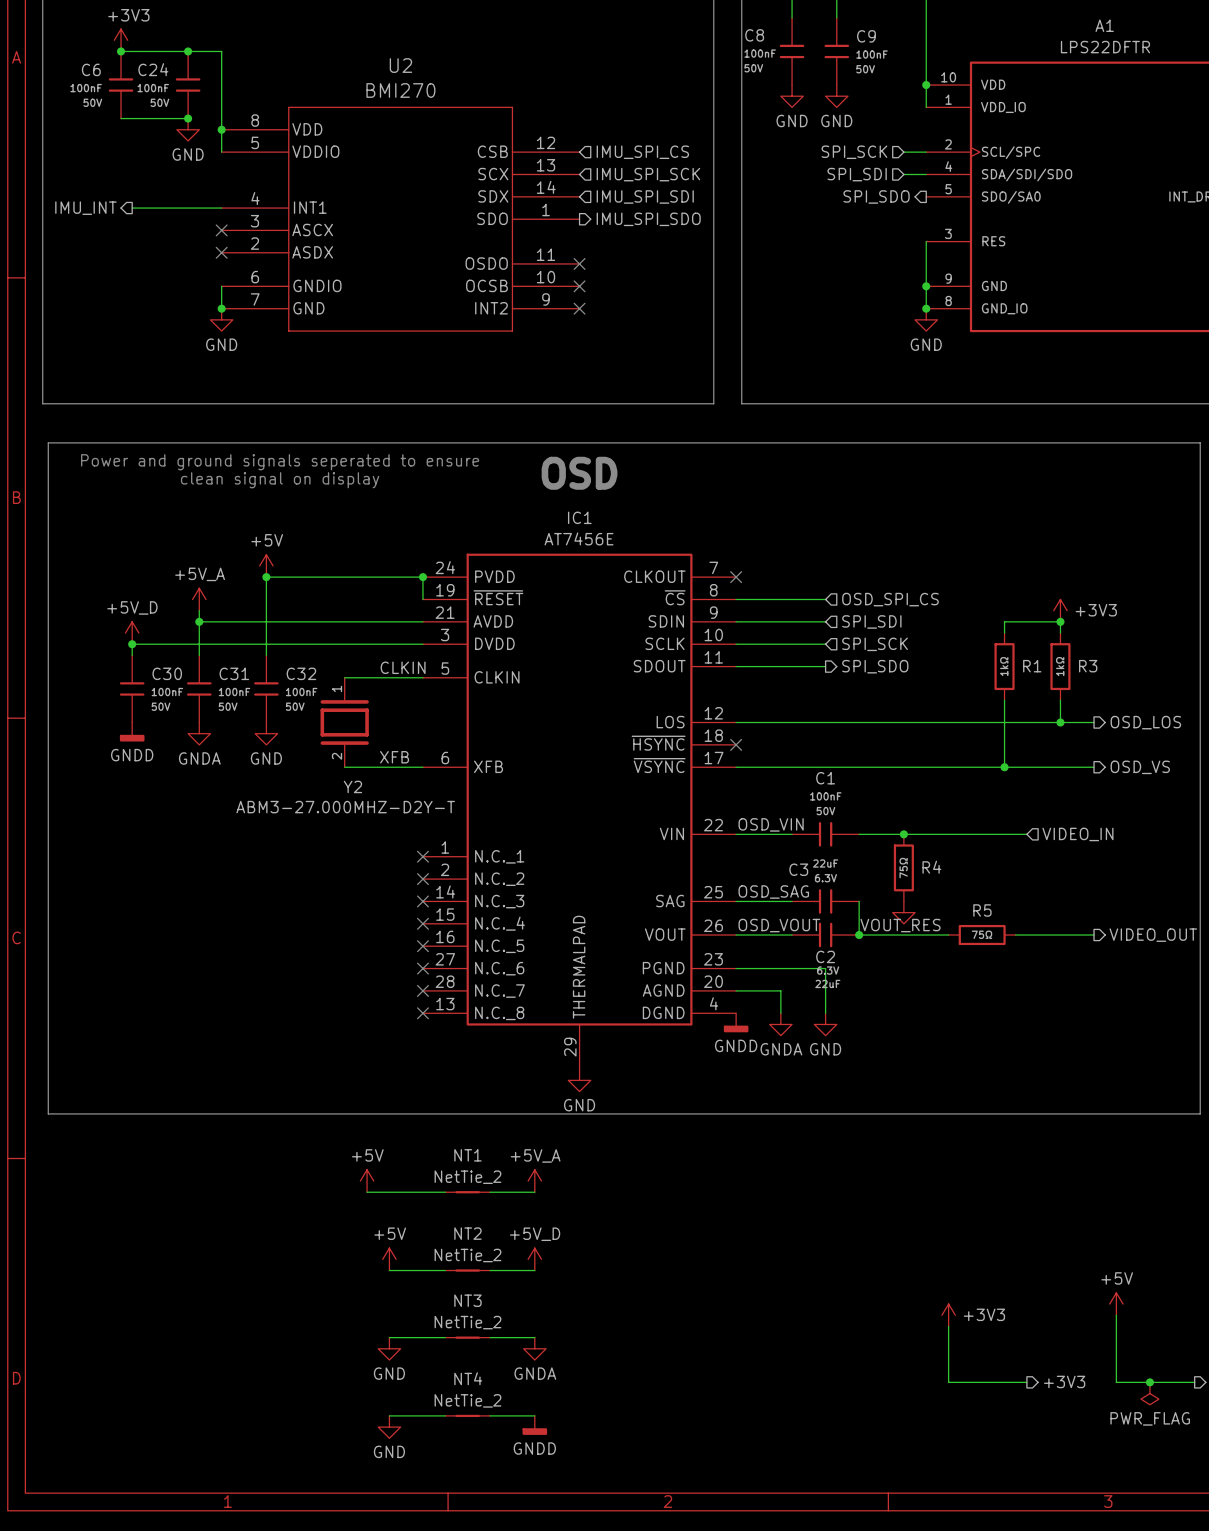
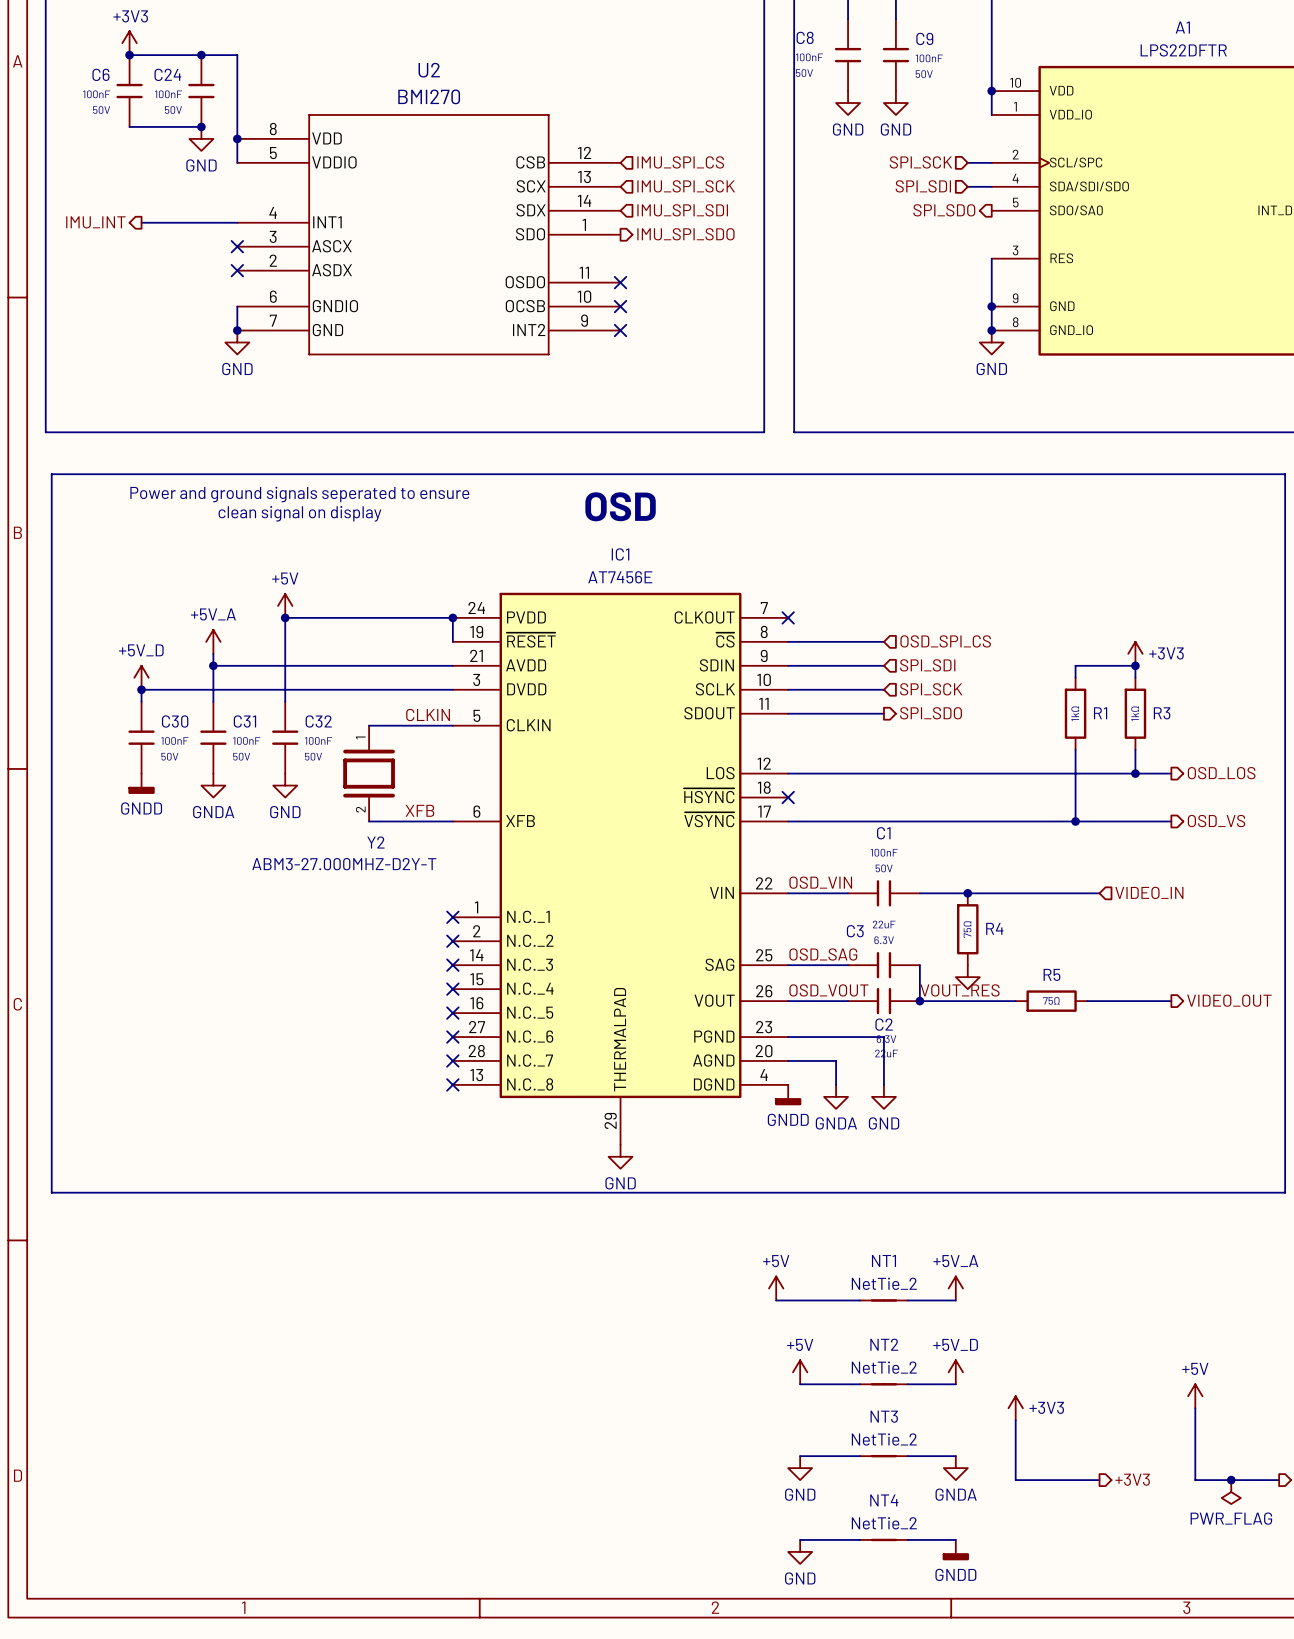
power symbol: +5V (367, 1181) -> none
power symbol: +5V_A (534, 1181) -> none
wire: (367, 1192) (445, 1192) -> none
NT1 position: (467, 1192) -> (883, 1300)
wire: (490, 1192) (534, 1192) -> none
power symbol: none -> +5V (776, 1288)
power symbol: none -> +5V_A (955, 1288)
wire: none -> (776, 1300) (860, 1300)
wire: none -> (907, 1300) (955, 1300)
power symbol: +5V (389, 1259) -> none
power symbol: +5V_D (534, 1259) -> none
wire: (389, 1270) (445, 1270) -> none
NT2 position: (467, 1270) -> (883, 1384)
wire: (490, 1270) (534, 1270) -> none
power symbol: none -> +5V (800, 1372)
power symbol: none -> +5V_D (955, 1372)
wire: none -> (800, 1384) (860, 1384)
wire: none -> (907, 1384) (955, 1384)
wire: (389, 1337) (445, 1337) -> none
NT3 position: (467, 1337) -> (883, 1456)
wire: (490, 1337) (534, 1337) -> none
power symbol: GND (389, 1348) -> none
power symbol: GNDA (534, 1348) -> none
wire: none -> (800, 1456) (860, 1456)
wire: none -> (907, 1456) (955, 1456)
power symbol: none -> GND (800, 1468)
power symbol: none -> GNDA (955, 1468)
wire: (389, 1415) (445, 1415) -> none
NT4 position: (467, 1415) -> (883, 1539)
wire: (490, 1415) (534, 1415) -> none
power symbol: GNDD (534, 1425) -> none
power symbol: GND (389, 1427) -> none
wire: none -> (800, 1539) (860, 1539)
wire: none -> (907, 1539) (955, 1539)
power symbol: none -> GNDD (955, 1550)
power symbol: none -> GND (800, 1551)

